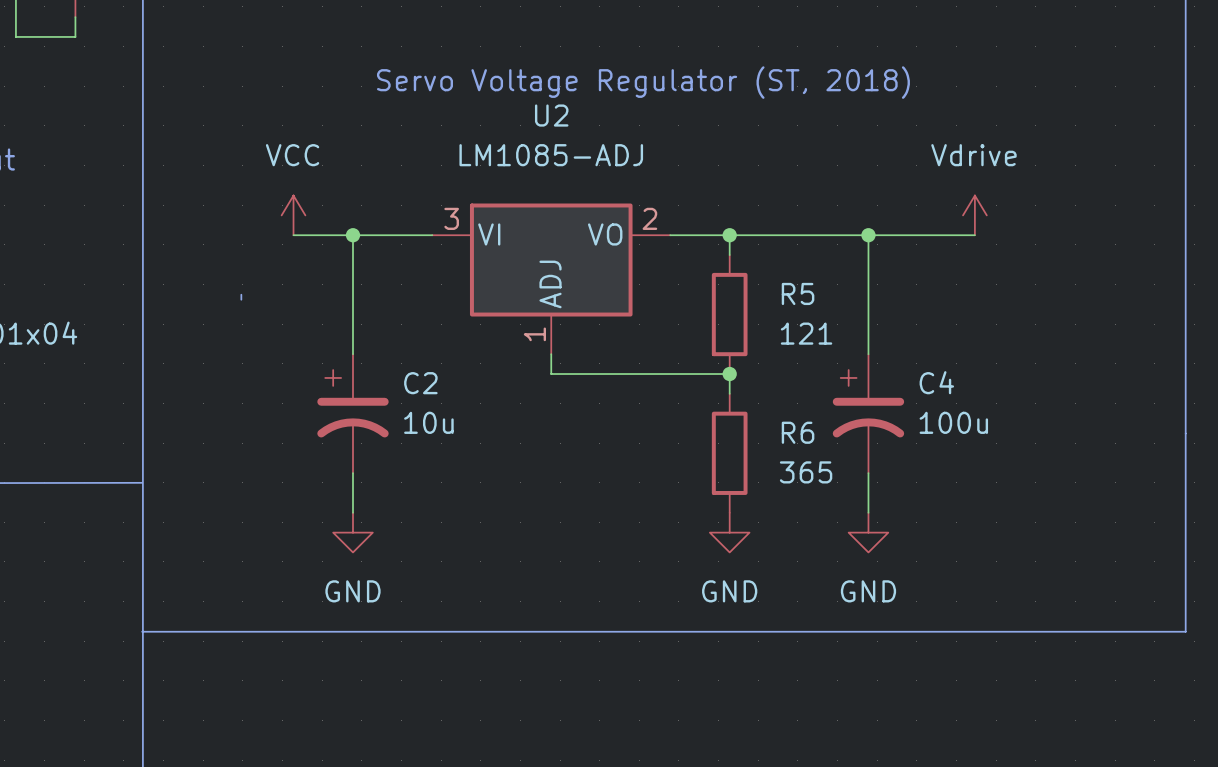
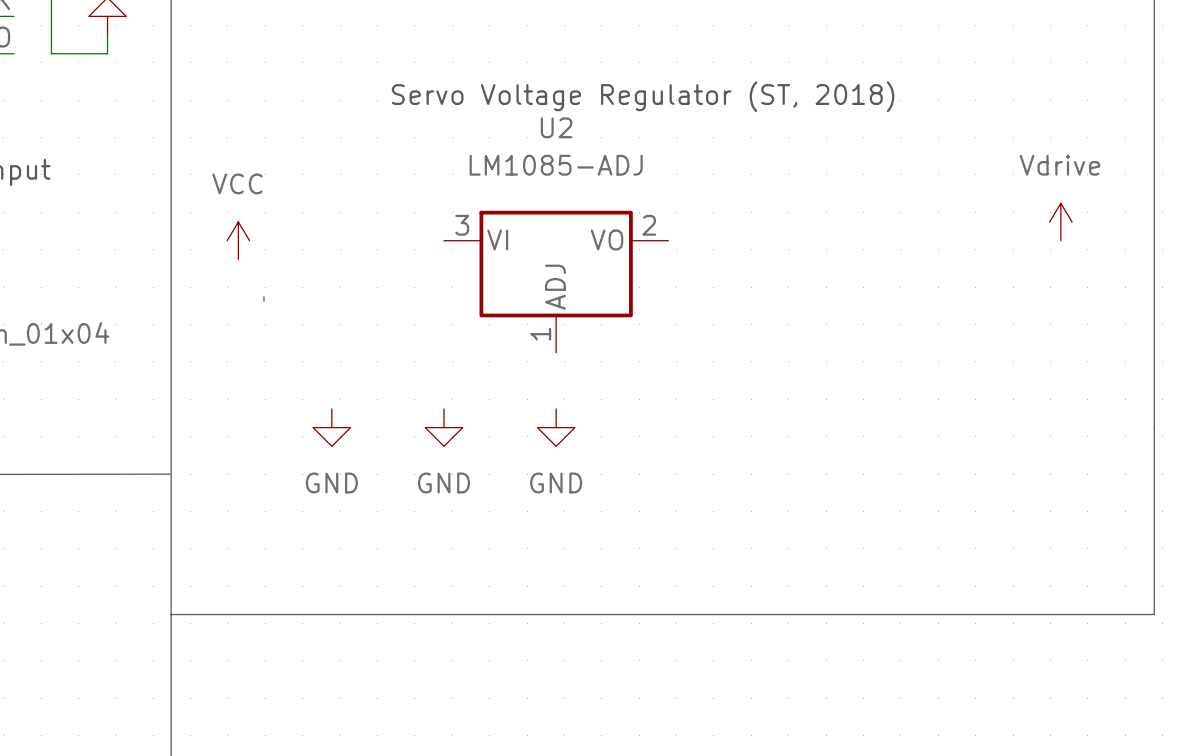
power symbol position: VCC (293, 215) -> VCC (238, 240)
power symbol position: Vdrive (974, 215) -> Vdrive (1060, 222)
wire: (293, 235) (432, 235) -> none
wire: (352, 235) (352, 354) -> none
junction: (352, 235) -> none
wire: (670, 235) (974, 235) -> none
wire: (729, 235) (729, 255) -> none
junction: (729, 235) -> none
wire: (868, 235) (868, 354) -> none
junction: (868, 235) -> none
R5: 121 (729, 314) -> none
wire: (551, 354) (551, 374) (729, 374) (729, 393) -> none
junction: (729, 374) -> none
C2: 10u (352, 413) -> none
C4: 100u (868, 413) -> none
power symbol: none -> GND (331, 427)
power symbol: none -> GND (444, 427)
power symbol: none -> GND (556, 427)
R6: 365 (729, 453) -> none
wire: (352, 473) (352, 512) -> none
wire: (868, 473) (868, 512) -> none
power symbol: GND (352, 532) -> none
power symbol: GND (729, 532) -> none
power symbol: GND (868, 532) -> none

